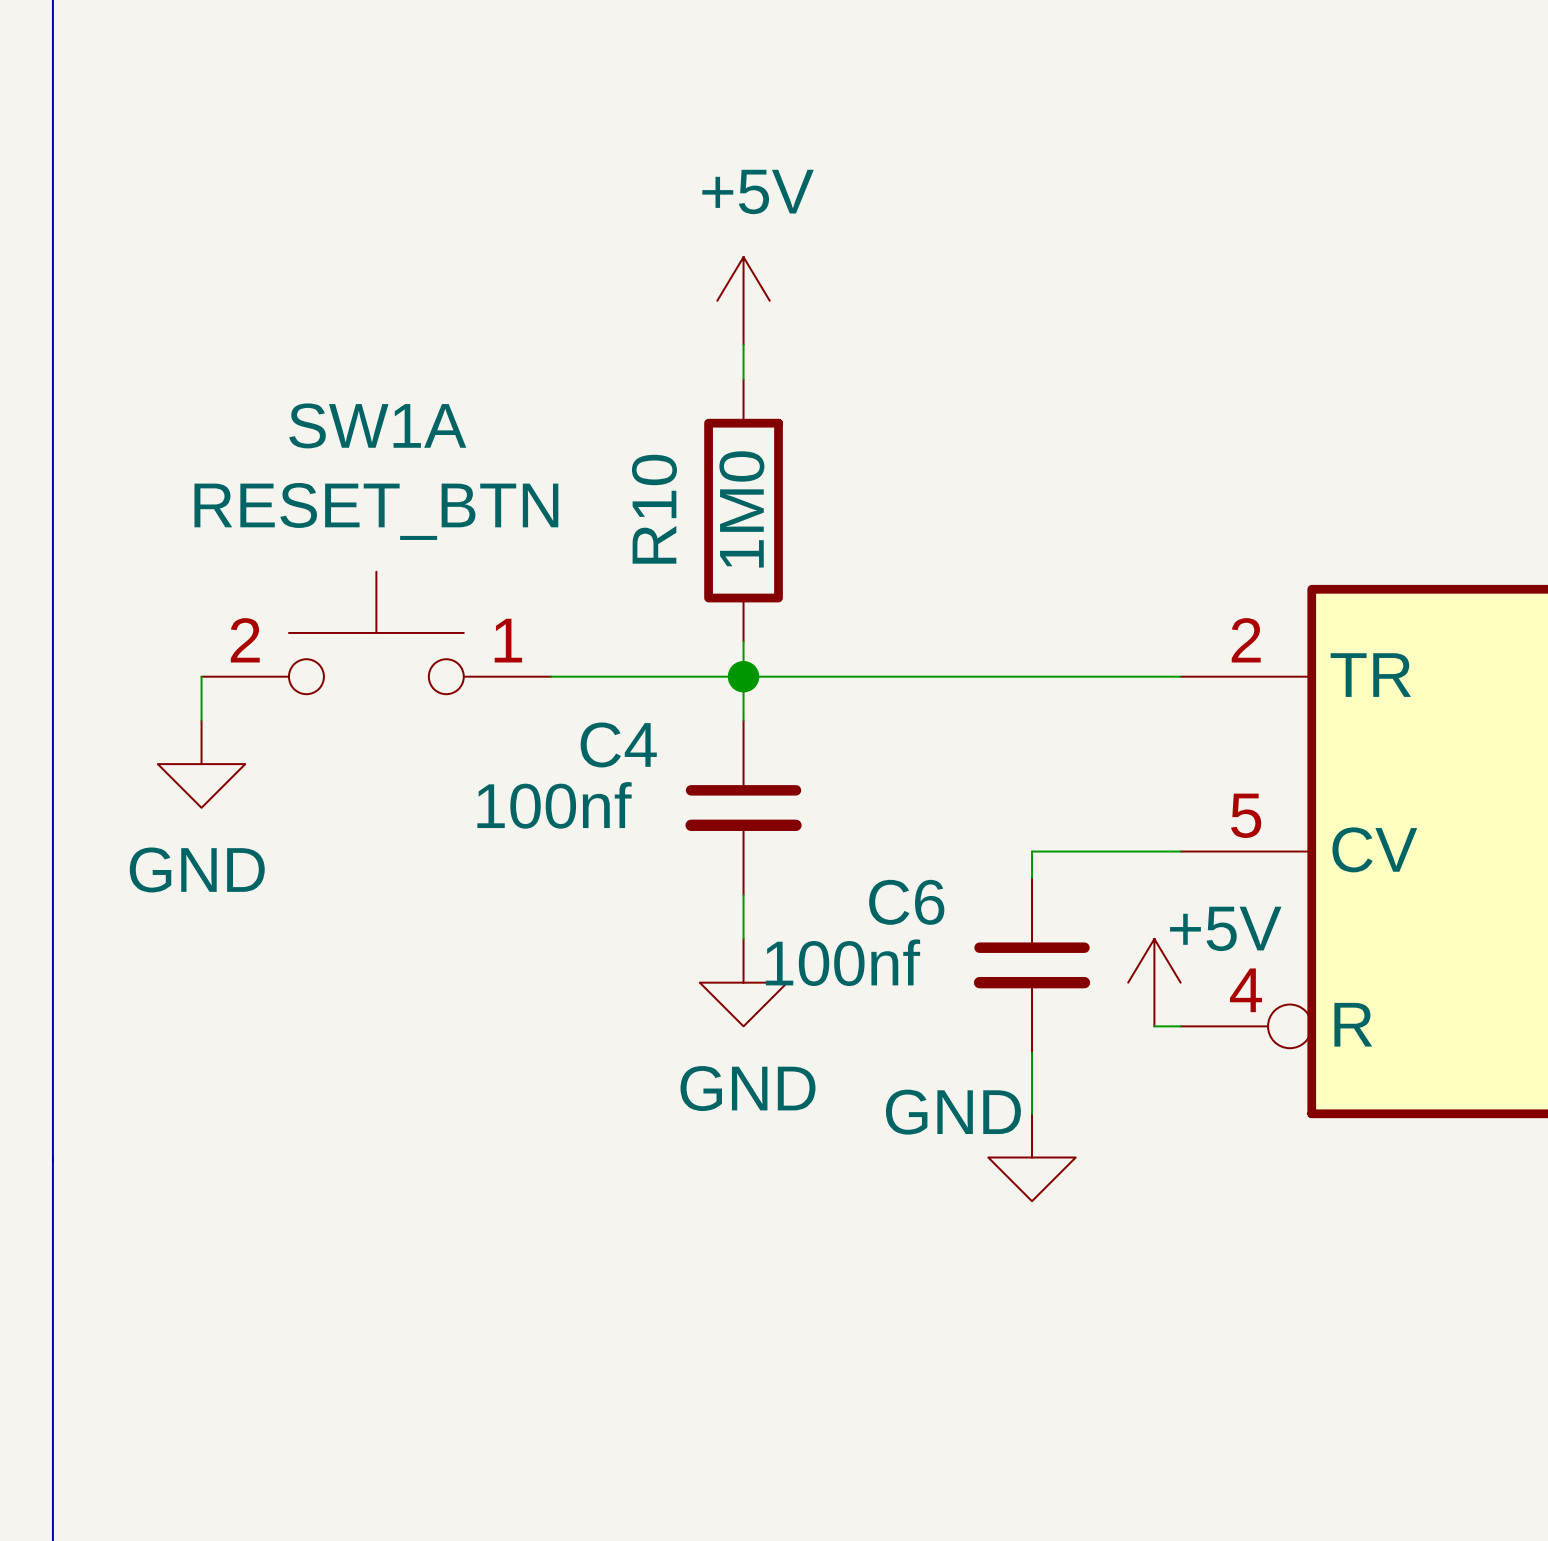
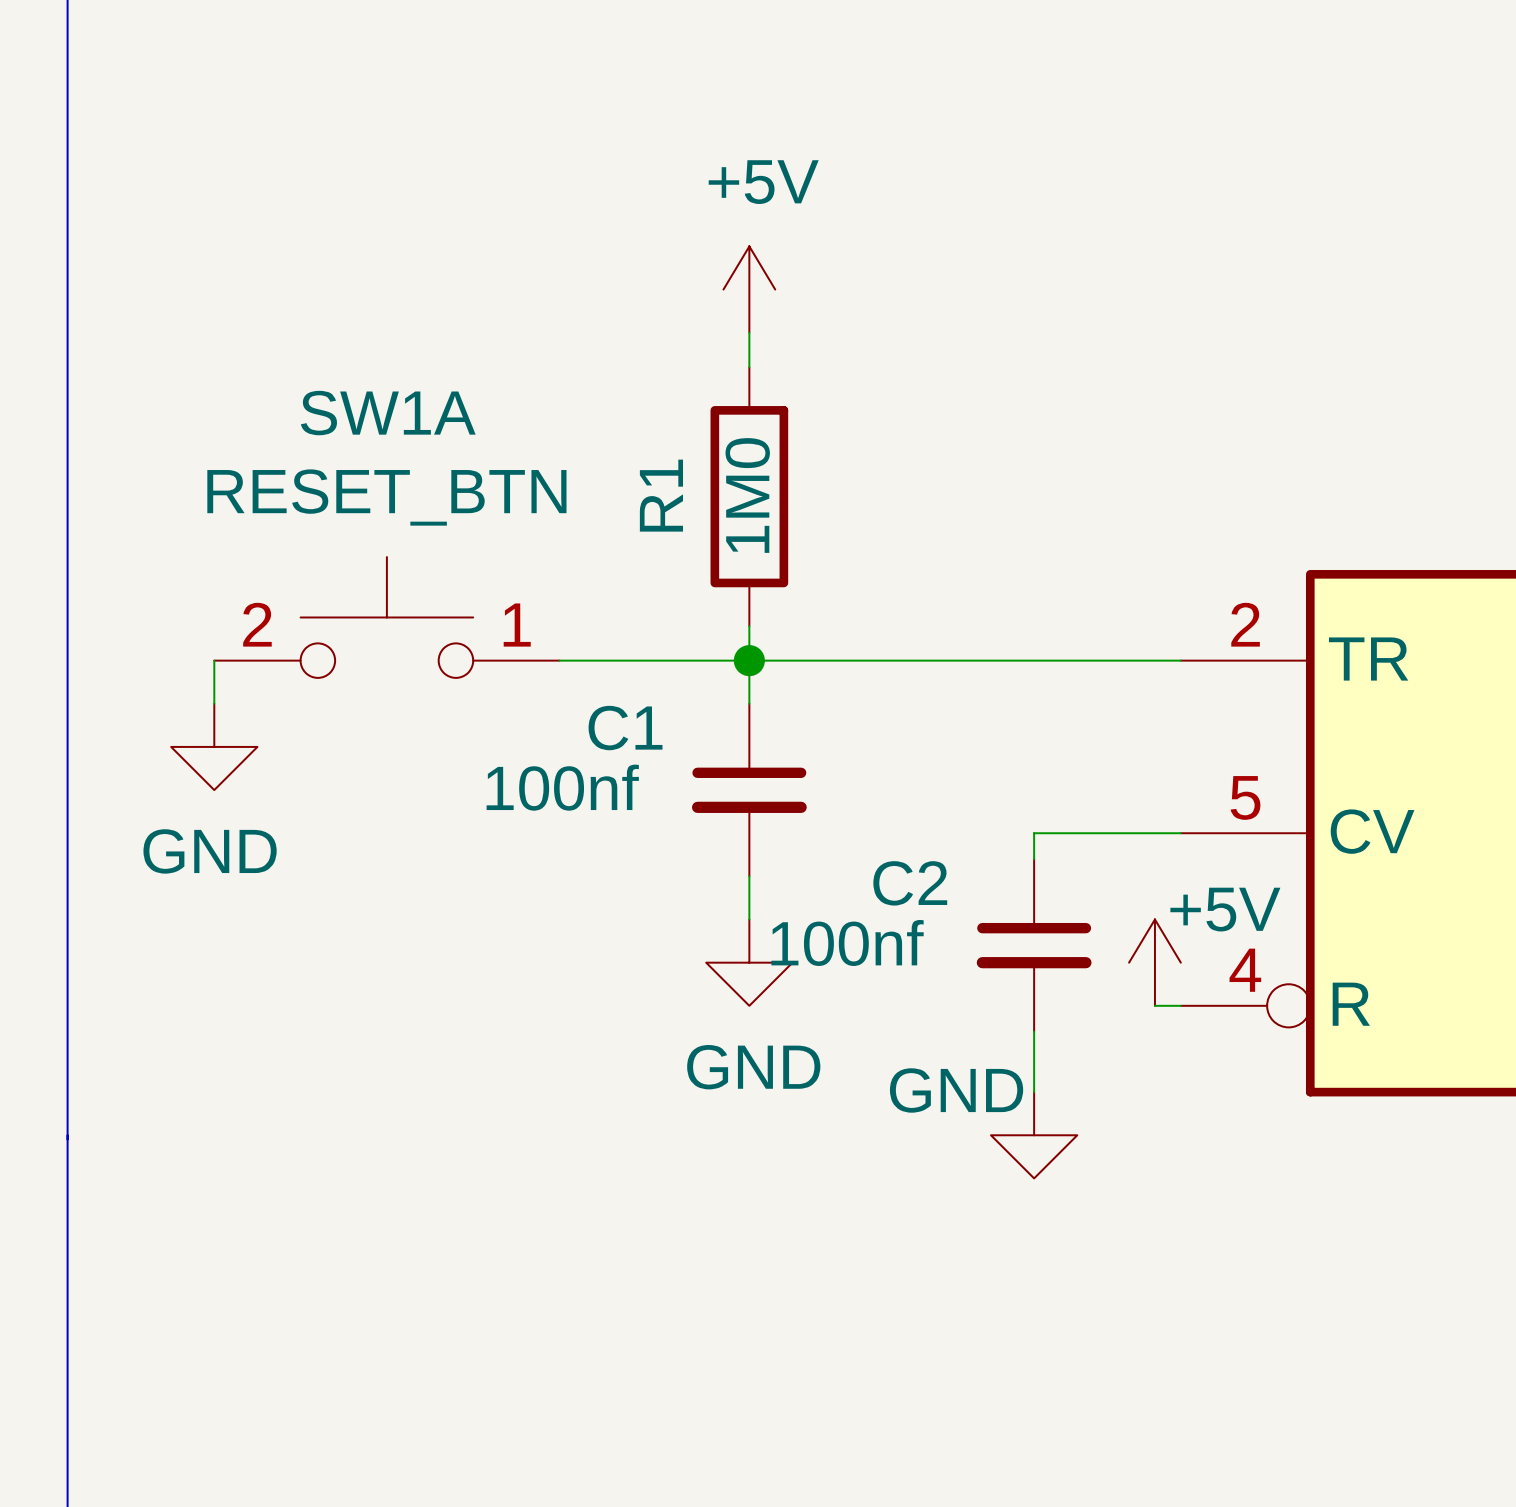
R10 name: R10 (654, 509) -> R1 (661, 495)
C4 name: C4 (618, 744) -> C1 (625, 728)
C6 name: C6 (906, 902) -> C2 (910, 883)

